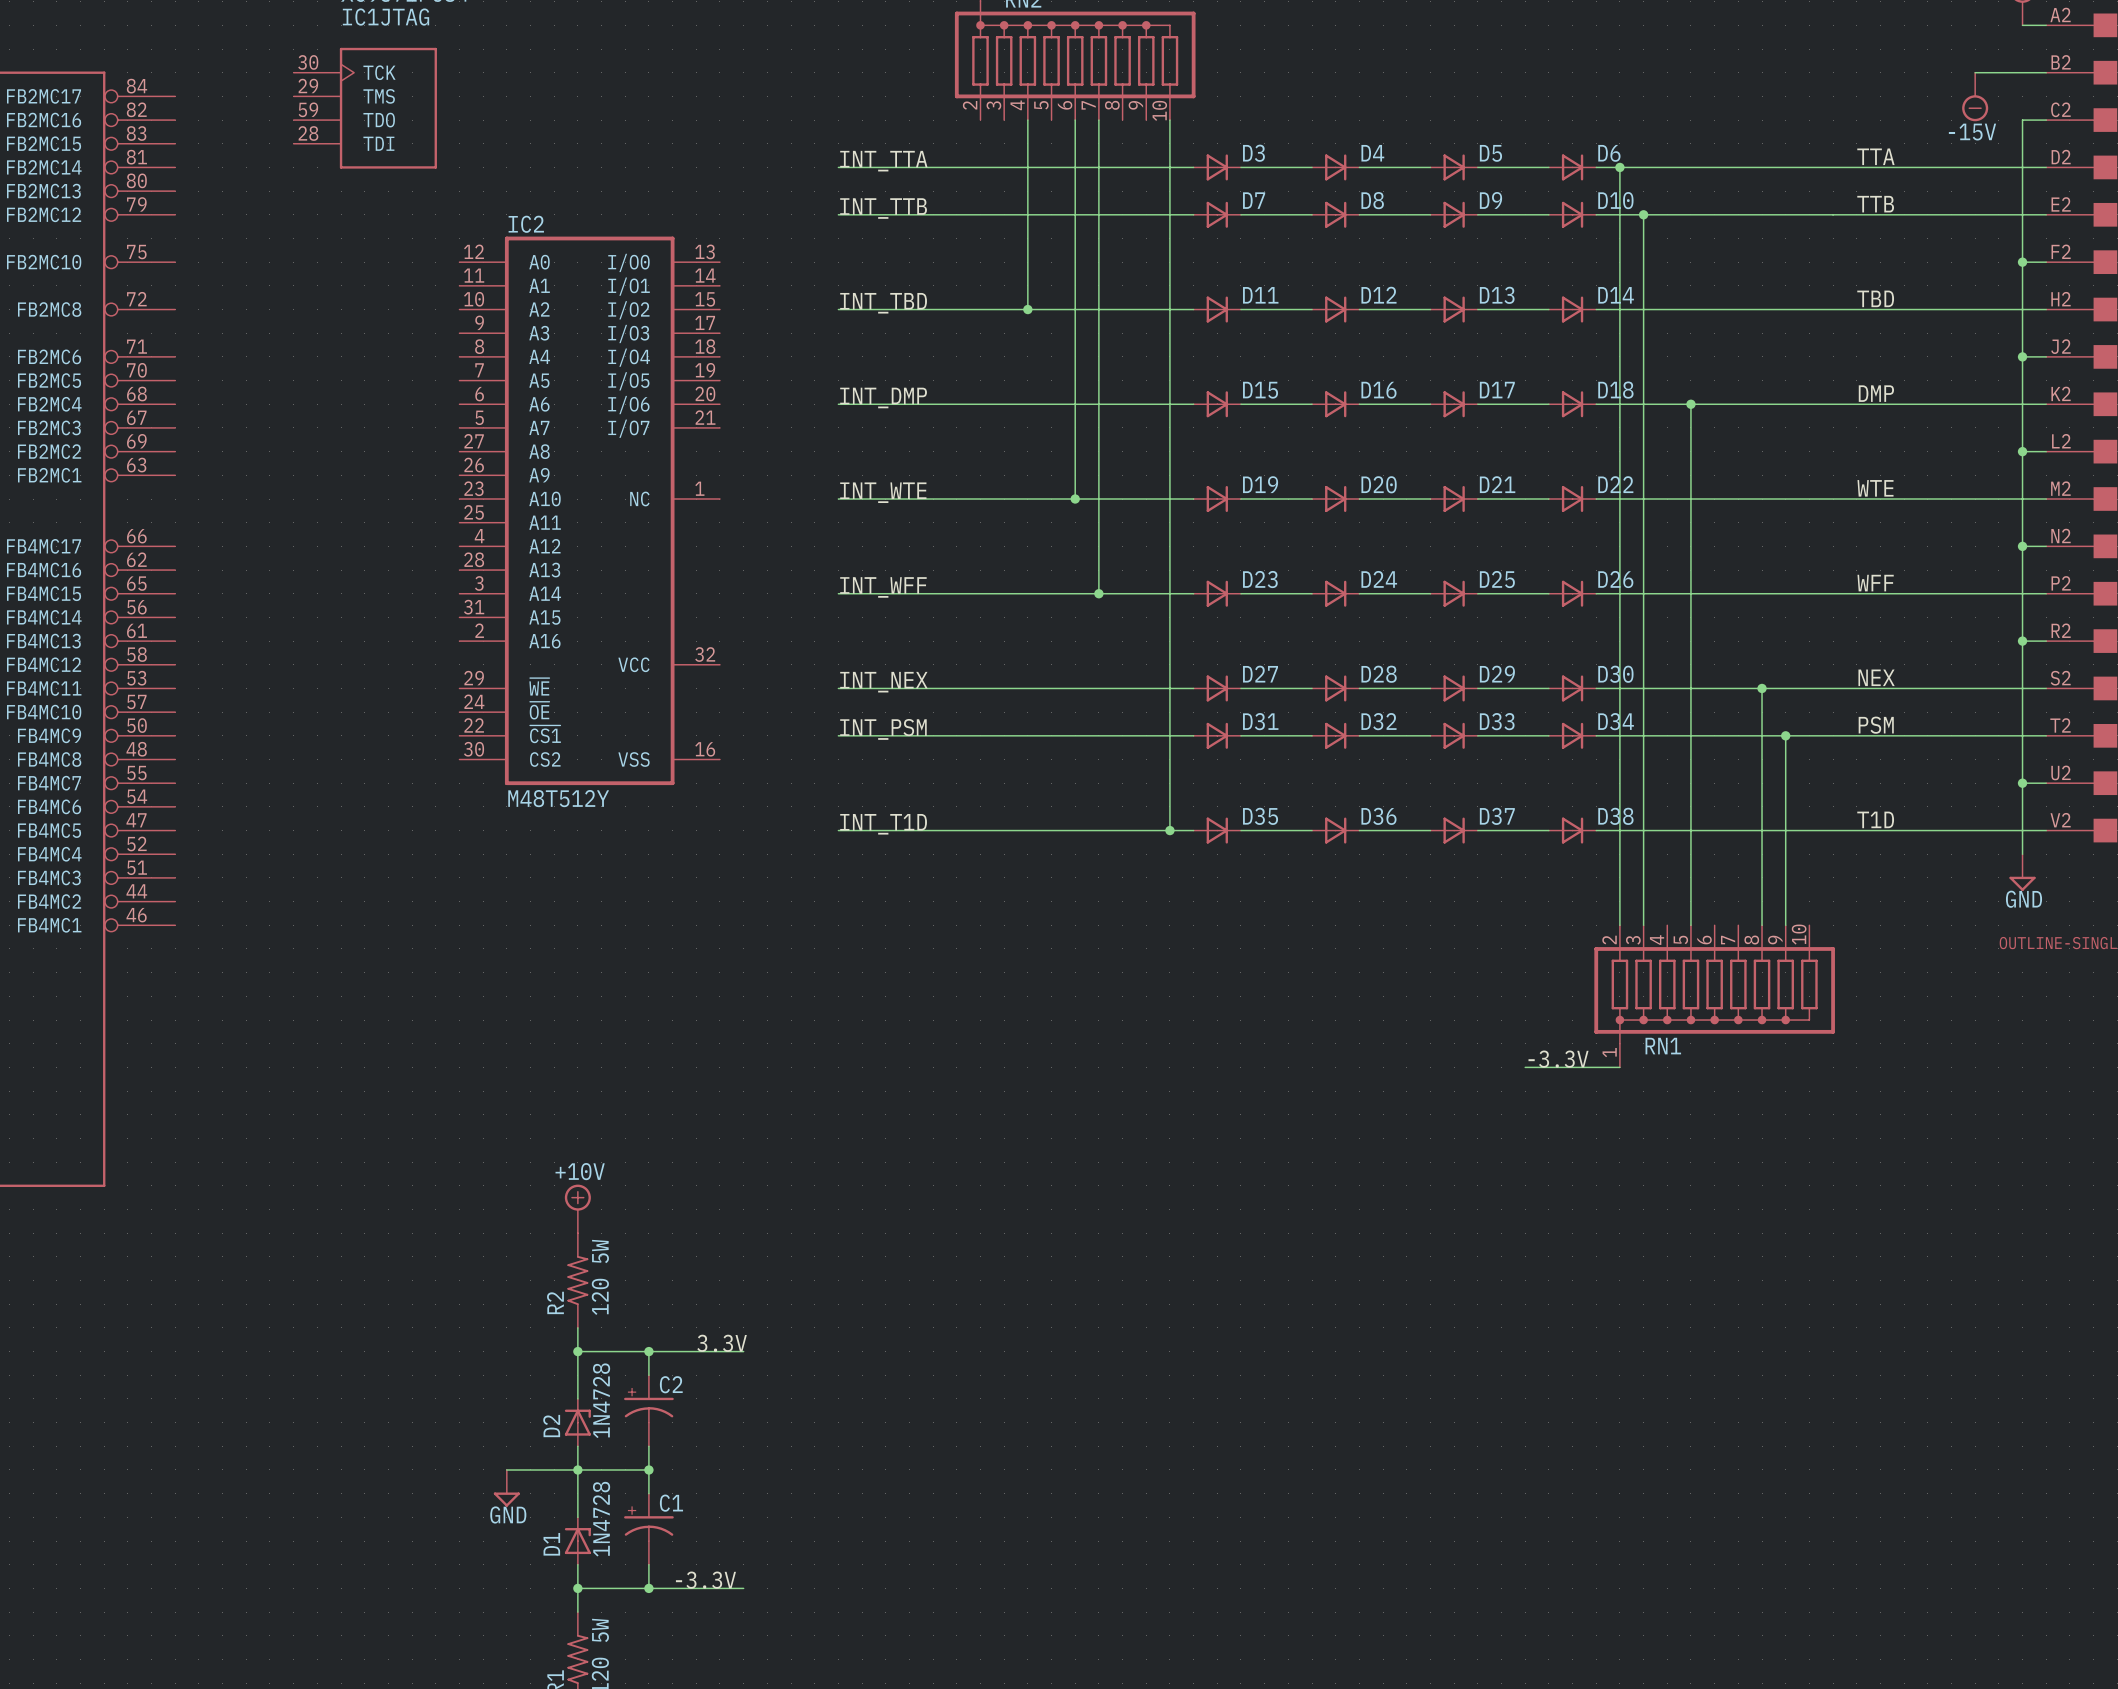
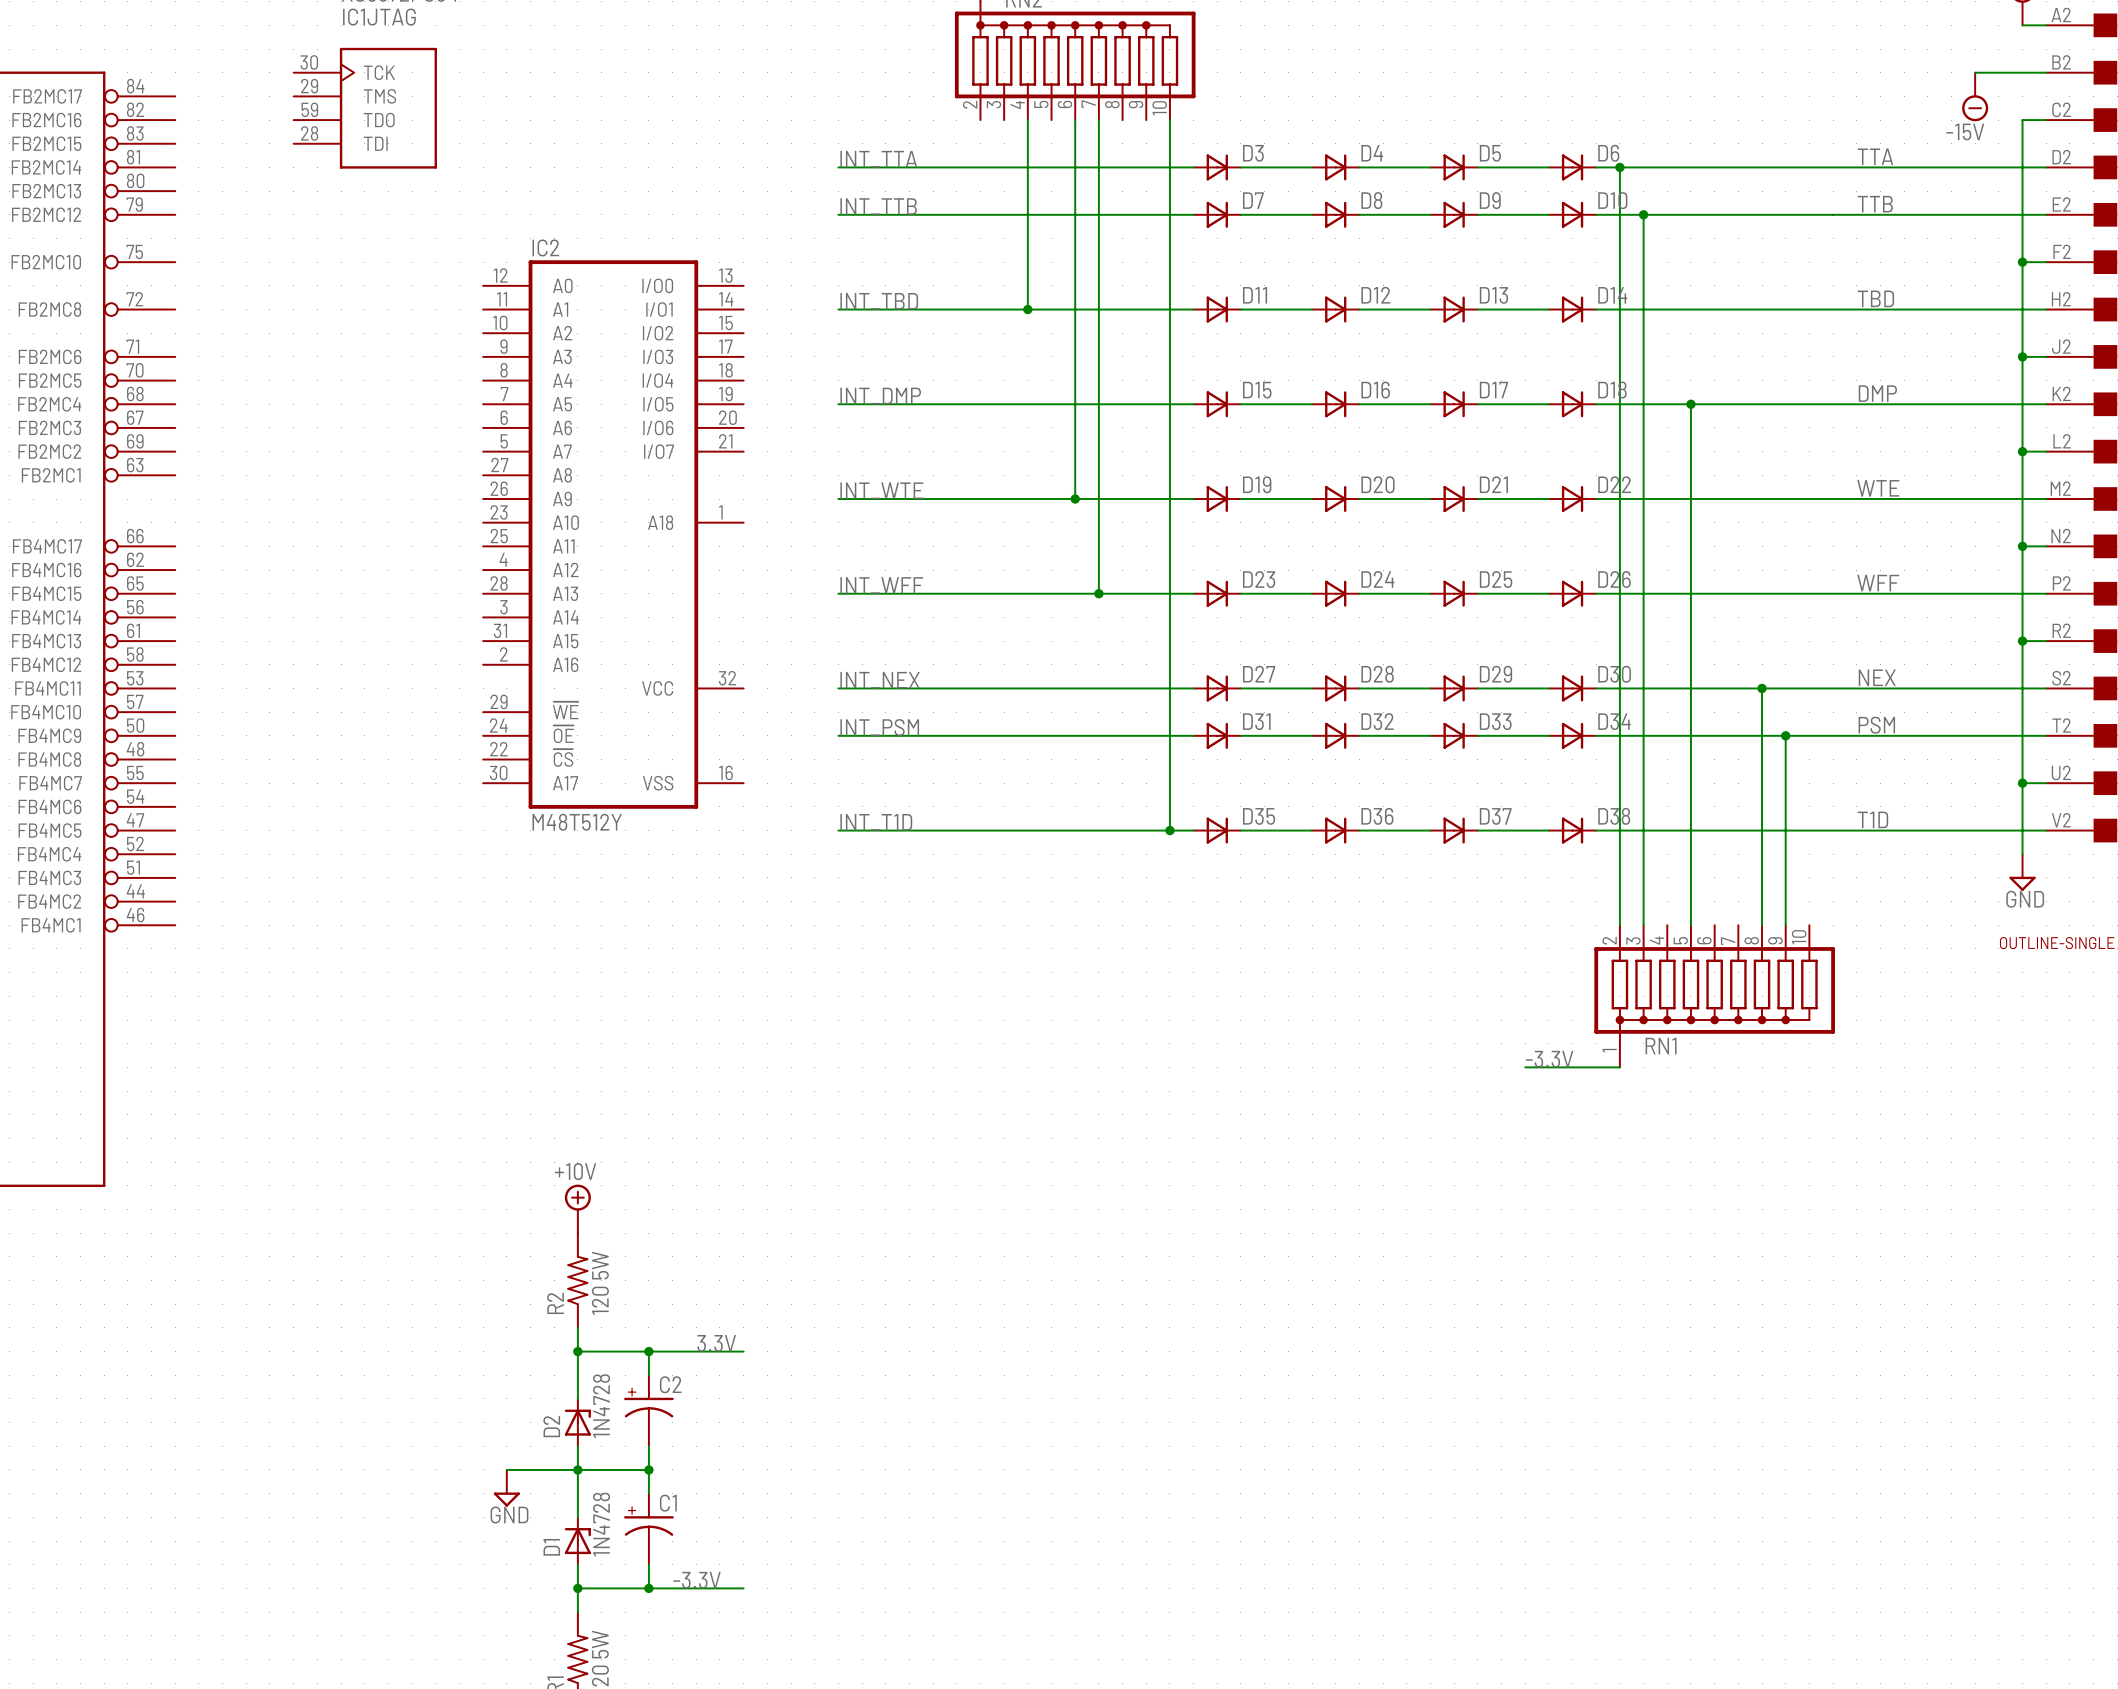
IC2 pin name: NC (639, 499) -> A18 (660, 522)
IC2 position: (589, 510) -> (613, 534)
IC2 pin name: ~{CS1} (545, 734) -> ~{CS} (563, 757)
IC2 pin name: CS2 (545, 759) -> A17 (565, 783)

